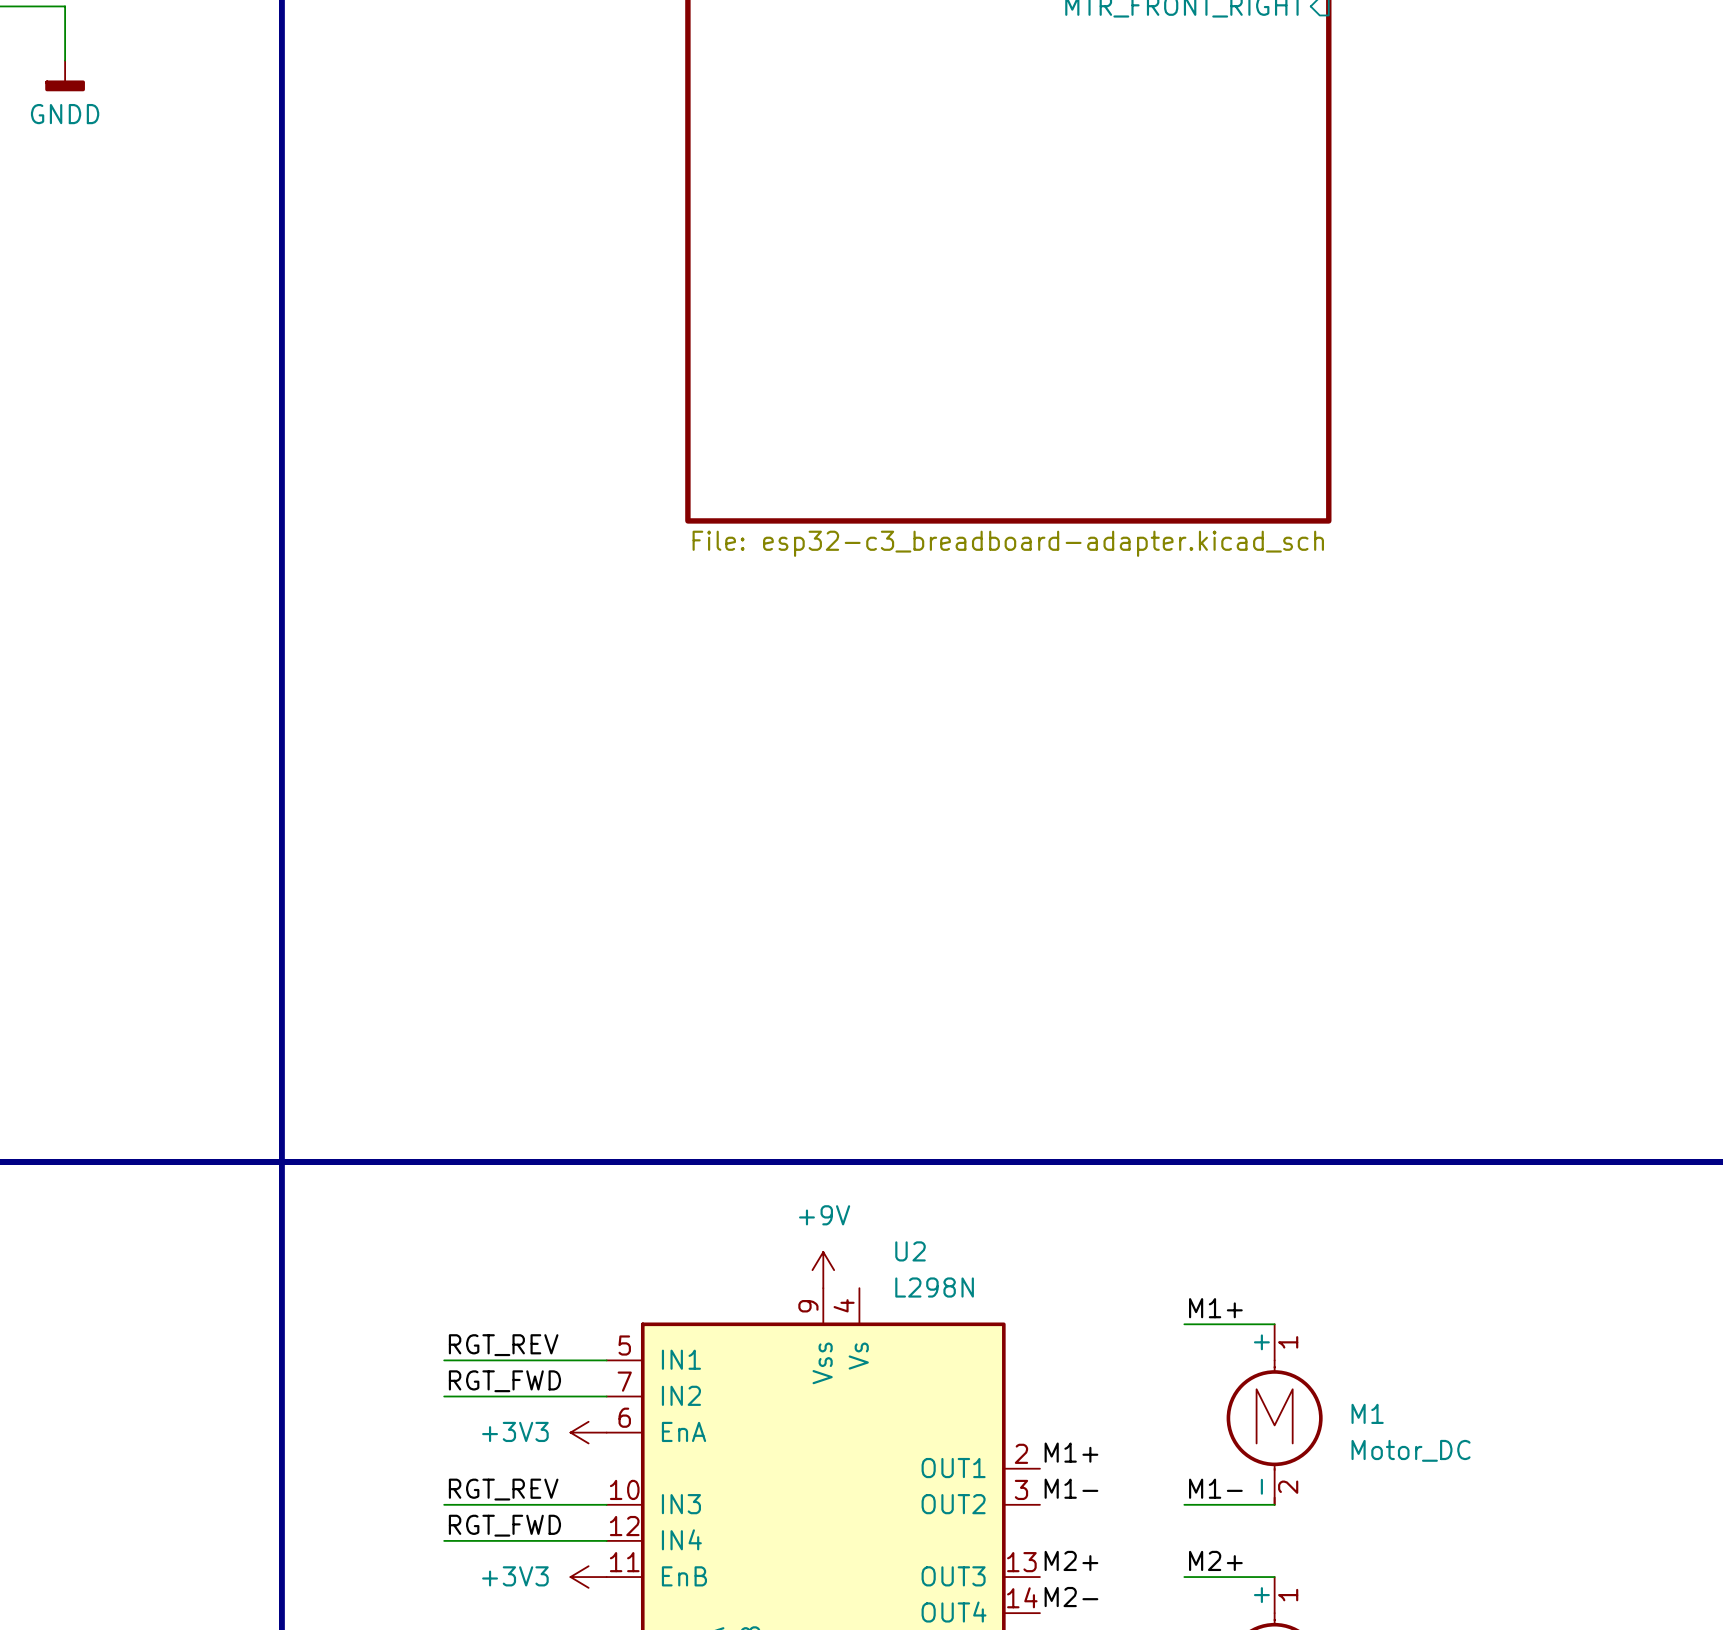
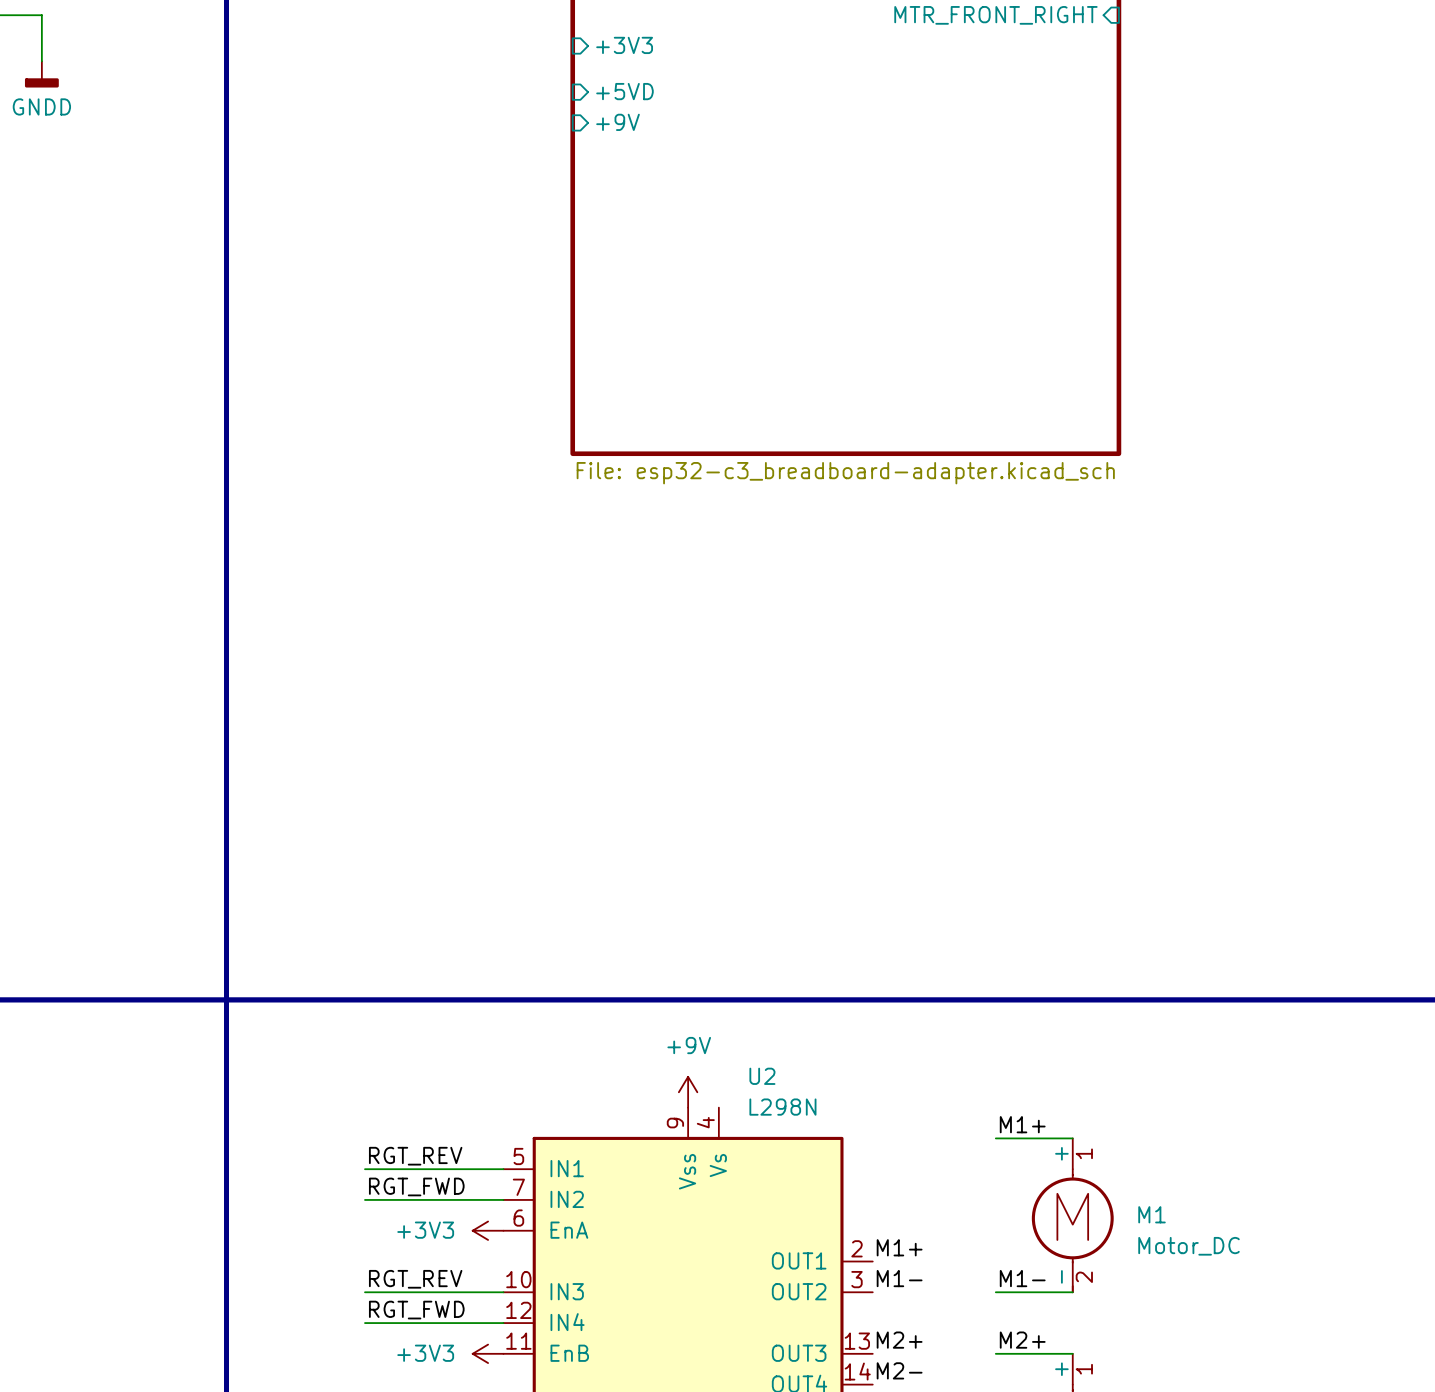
sheet pin: none -> +3V3 (624, 45)
sheet pin: none -> +5VD (624, 91)
sheet pin: none -> +9V (618, 122)

